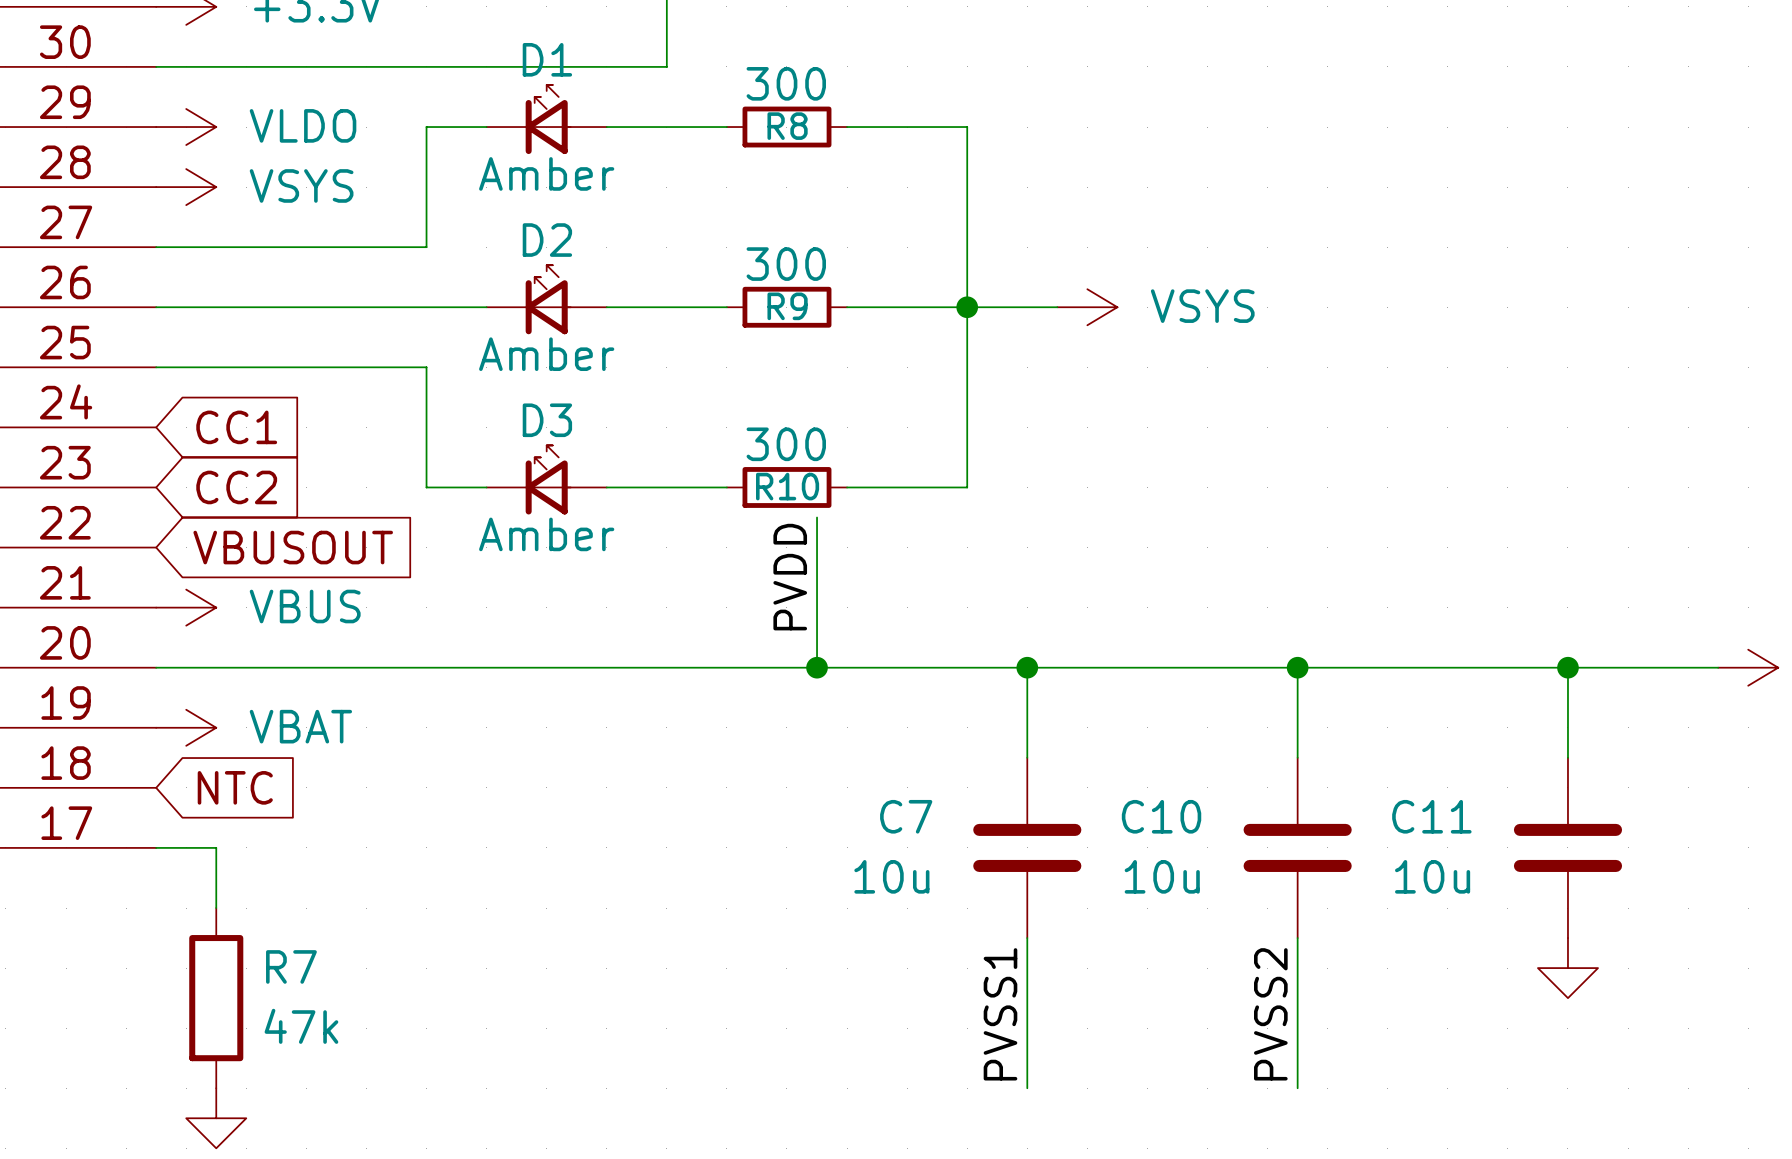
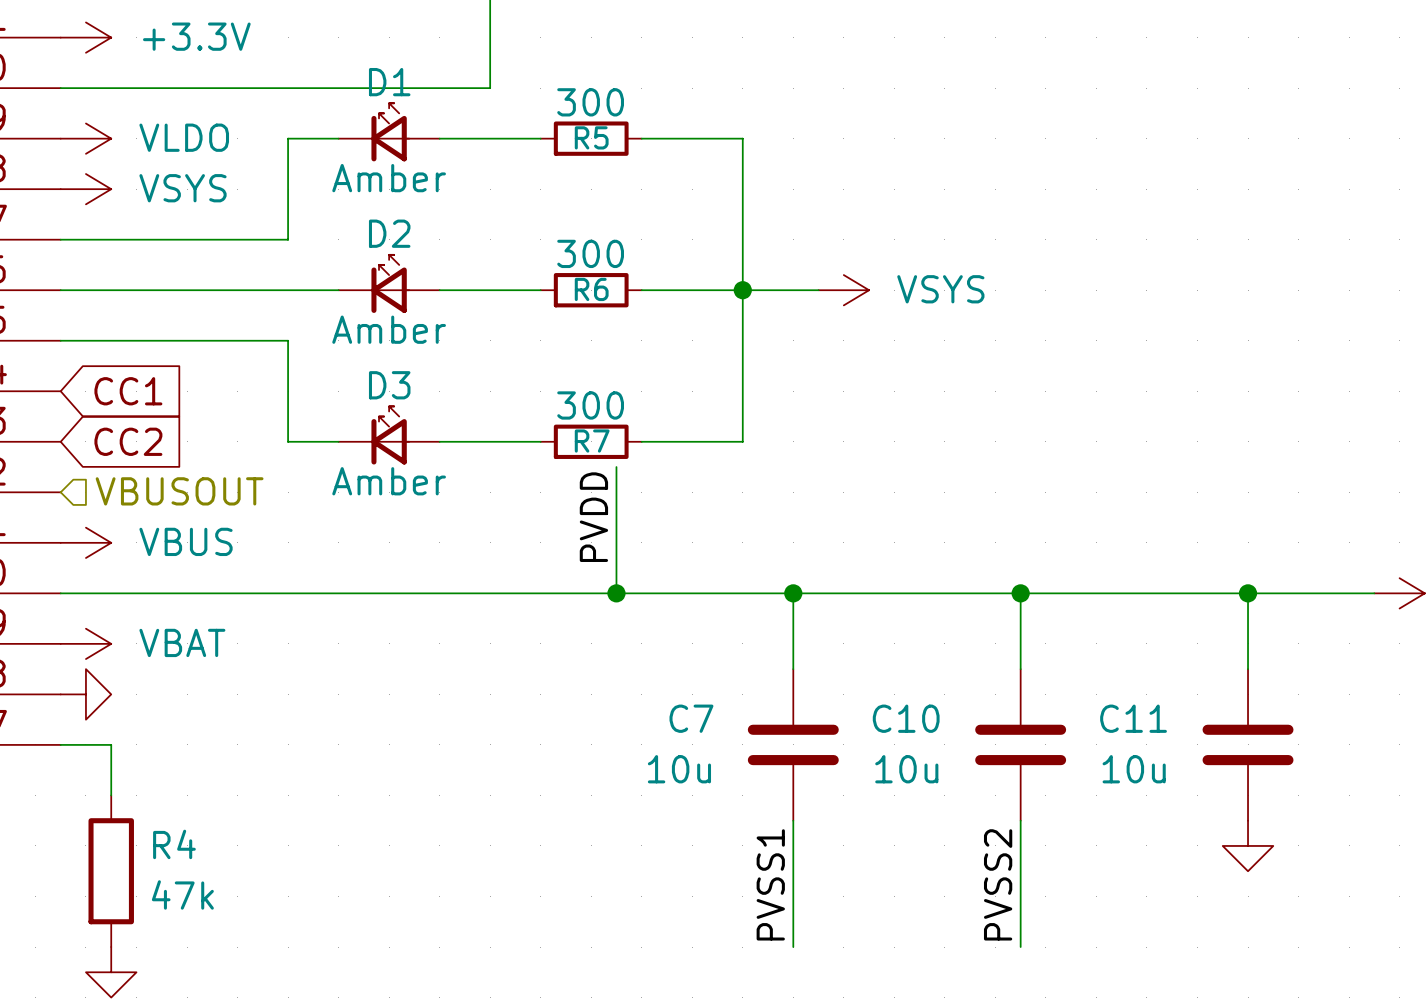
R8 name: R8 (787, 126) -> R5 (591, 137)
R9 name: R9 (787, 306) -> R6 (591, 289)
R10 name: R10 (787, 486) -> R7 (592, 441)
hierarchical label: none -> VBUSOUT (179, 491)
global label: VBUSOUT (293, 547) -> none
power symbol: none -> (85, 694)
global label: NTC (235, 787) -> none
R7 name: R7 (291, 966) -> R4 (174, 844)

